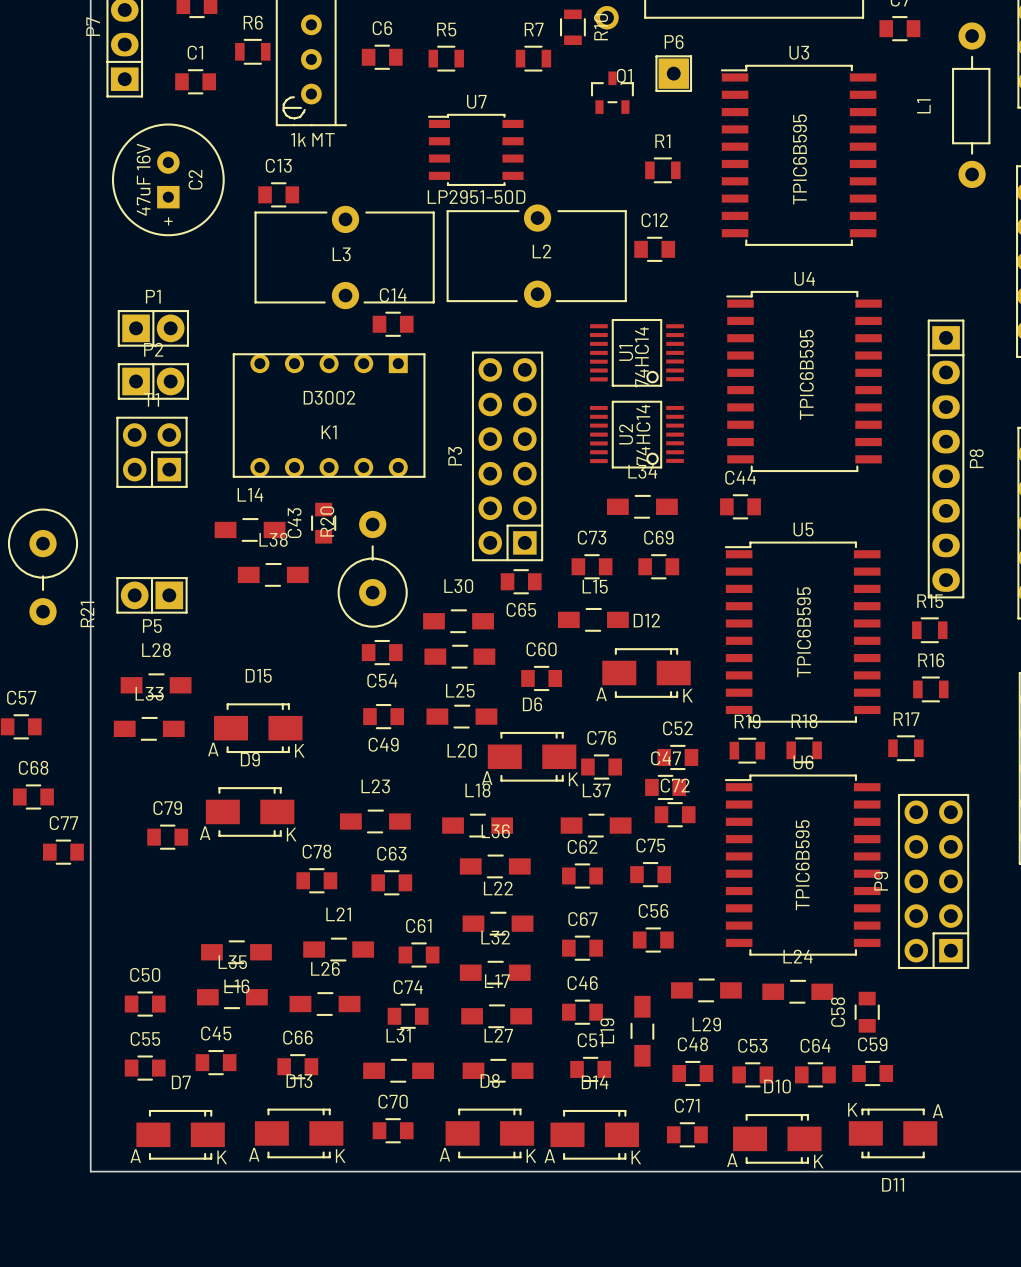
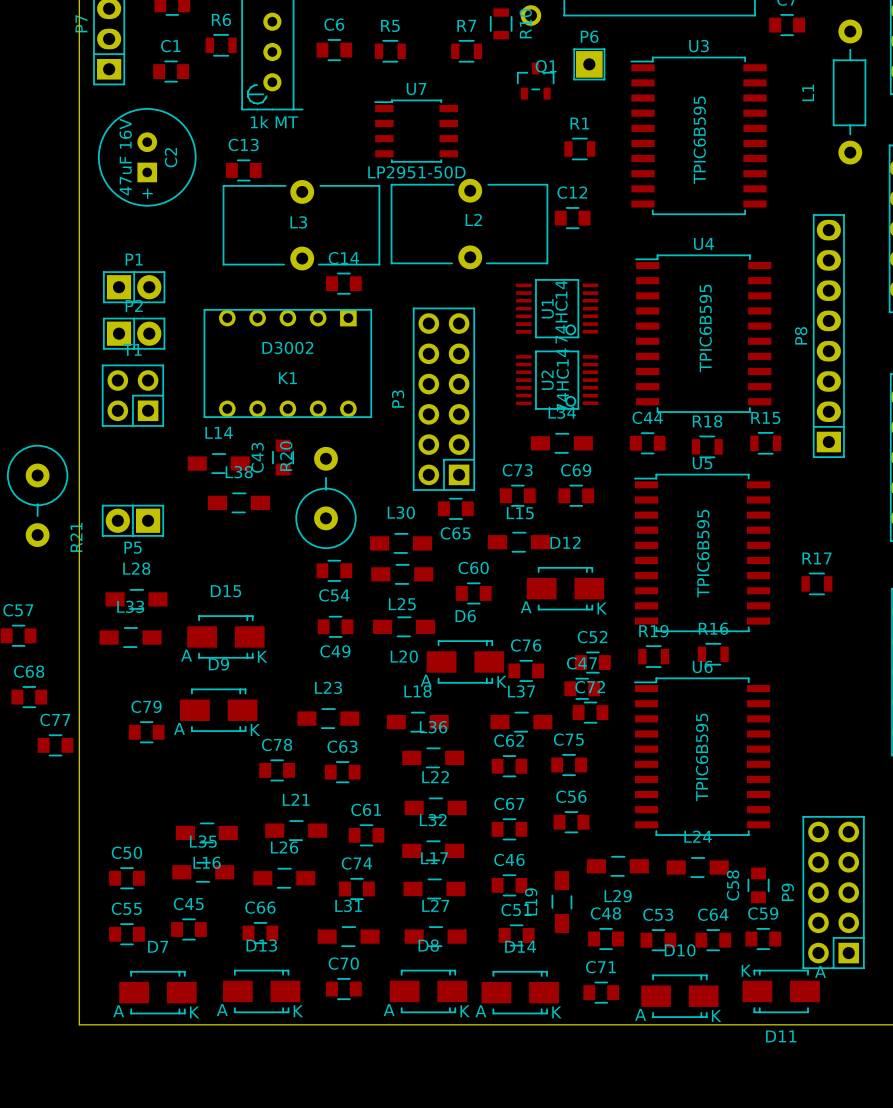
P8 rotation: 0° (946, 458) -> 180° (828, 336)
R15 position: (929, 630) -> (765, 443)
R16 position: (930, 689) -> (713, 654)
R17 position: (905, 748) -> (816, 583)
R18 position: (804, 750) -> (707, 446)
P9 position: (933, 881) -> (833, 892)

